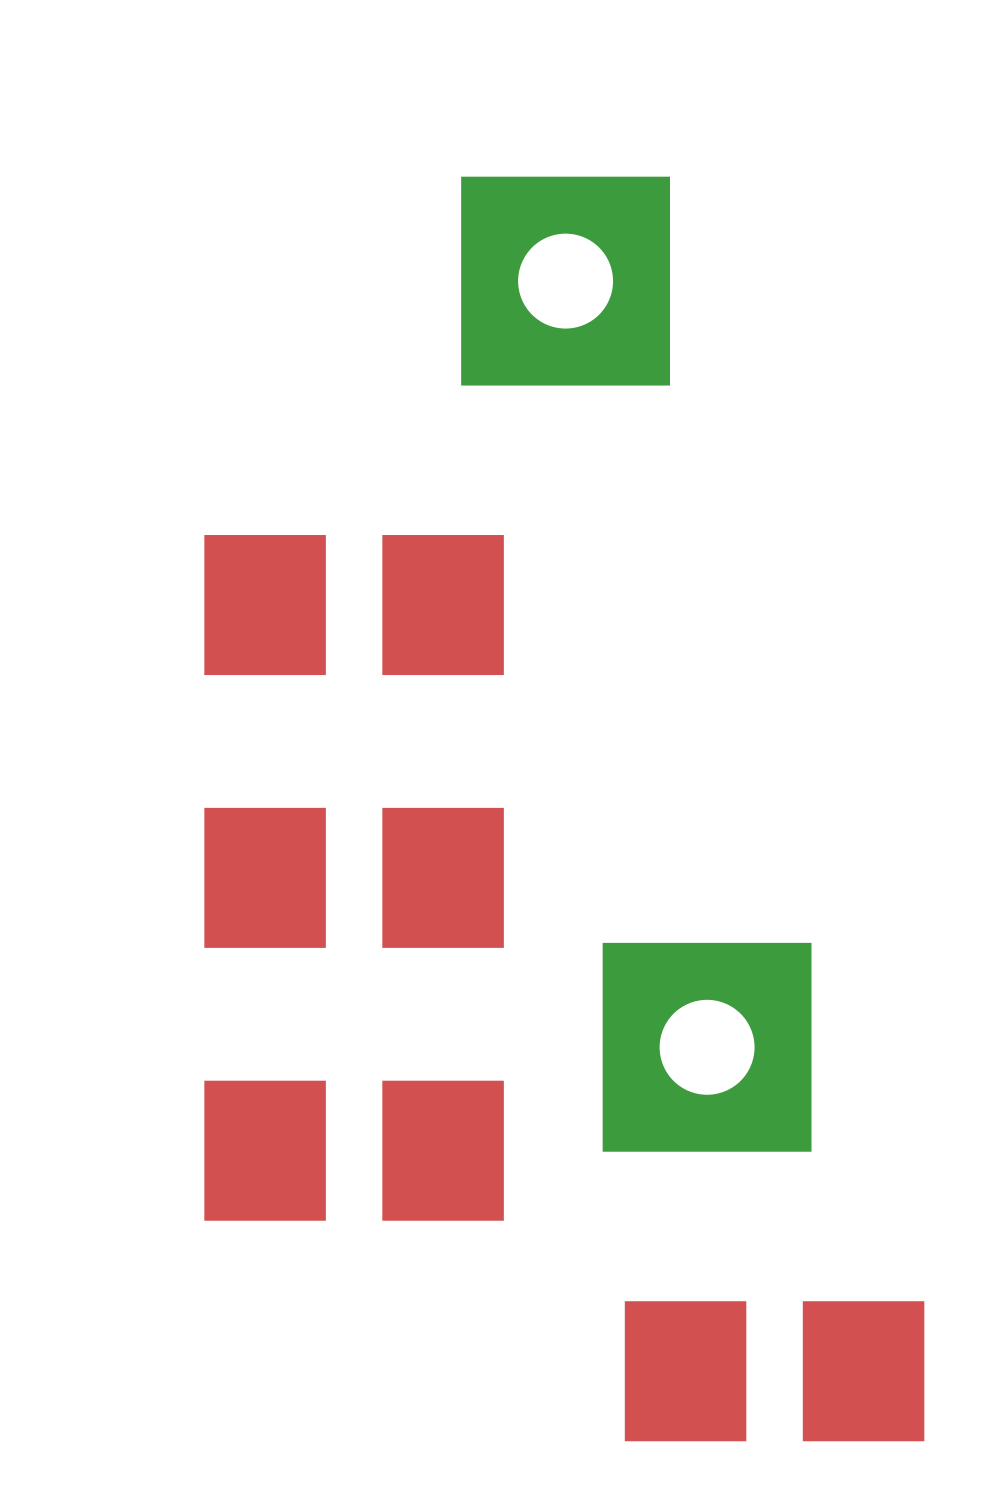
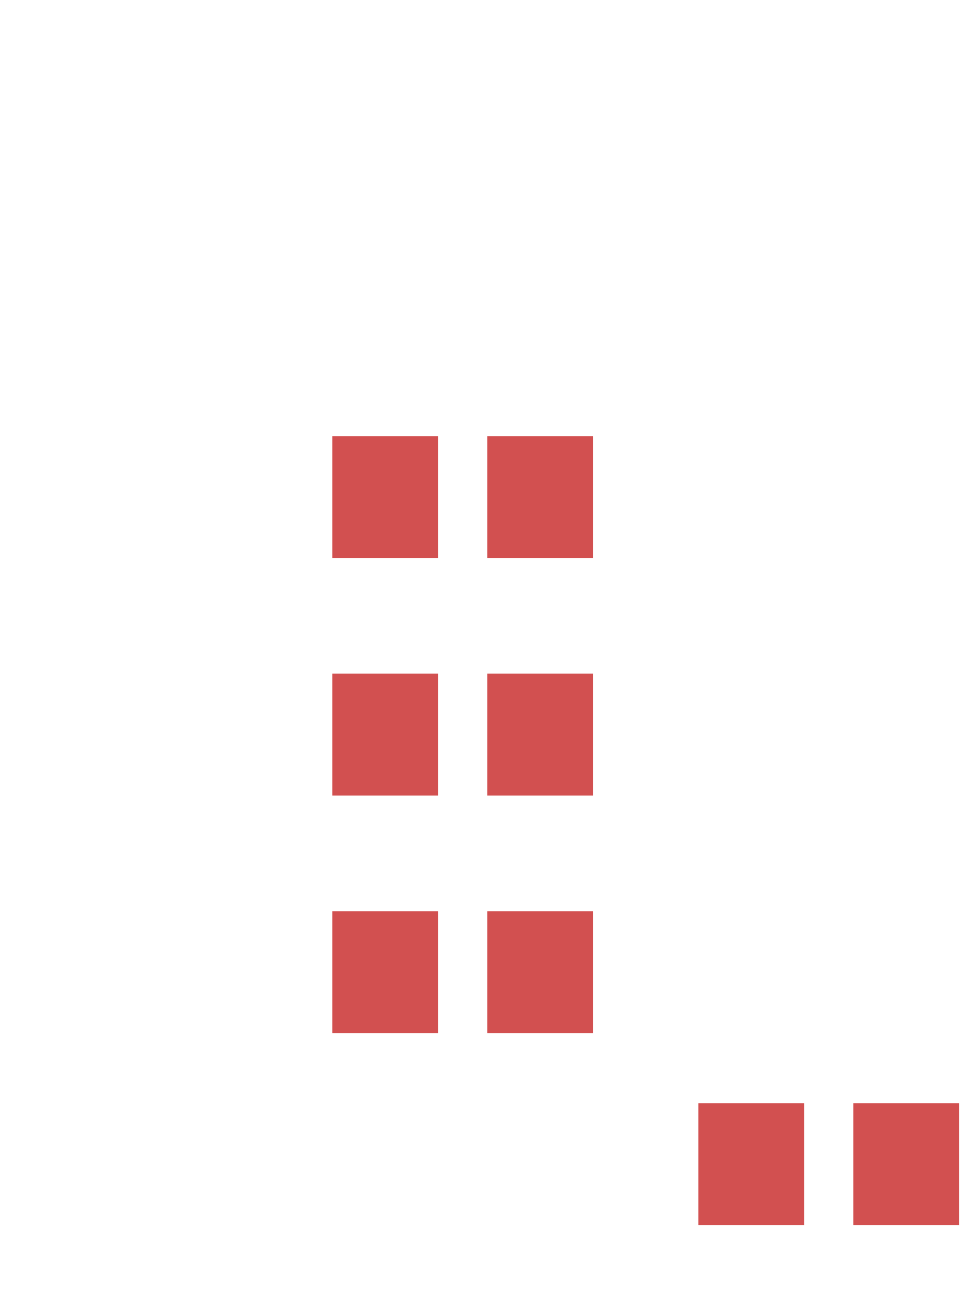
part: (565, 281) -> none
part: (707, 1047) -> none

